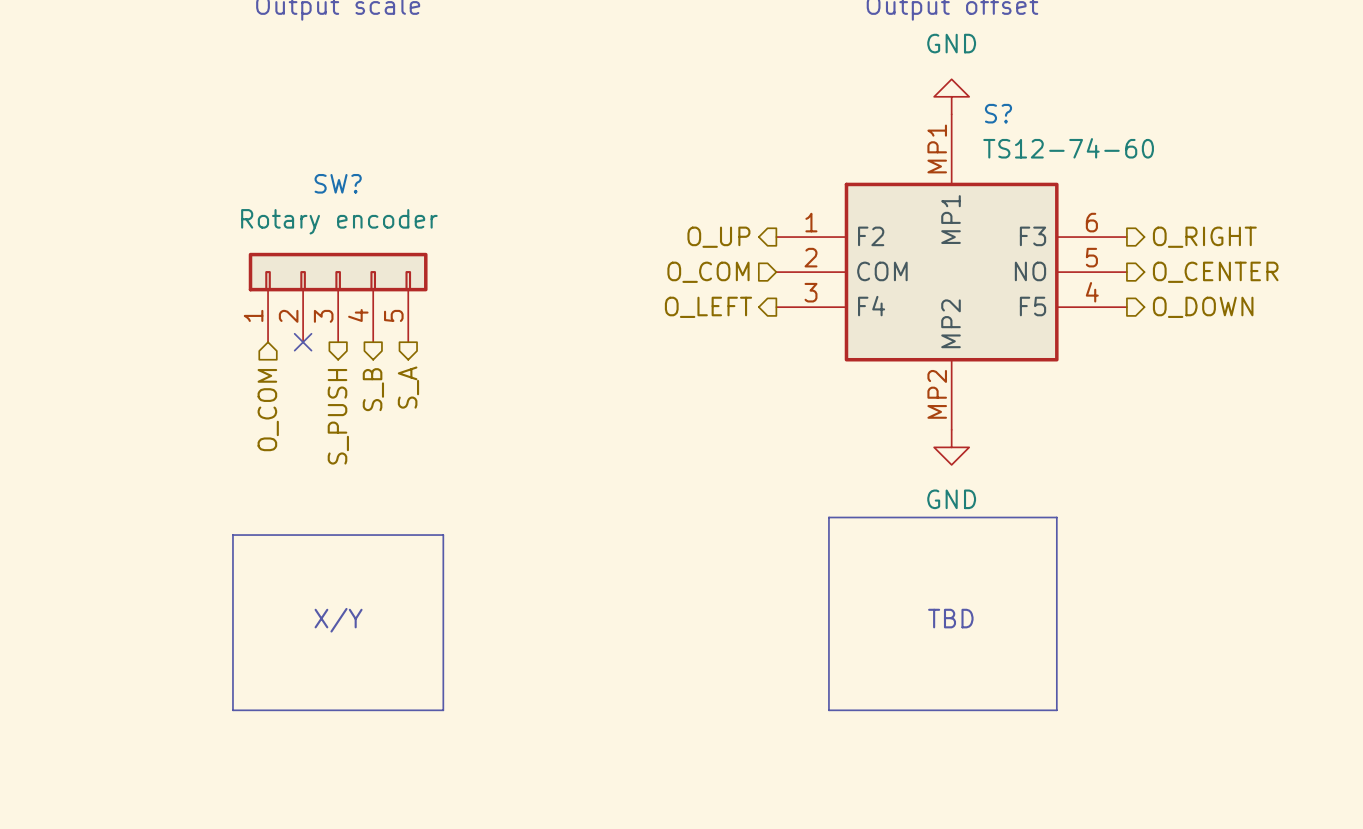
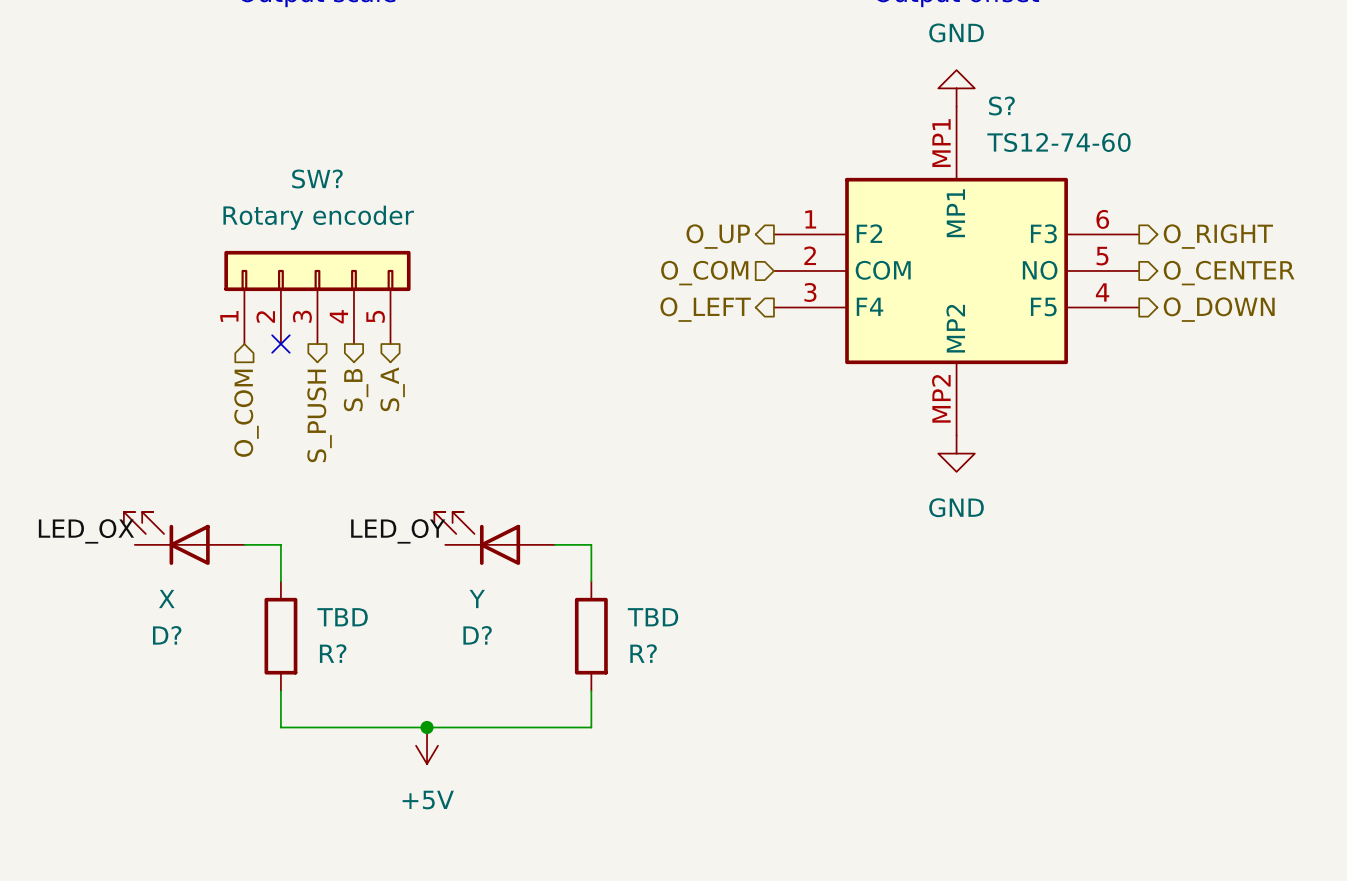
line: (828, 517) (1056, 517) (1056, 710) (828, 710) (828, 517) -> none
label: none -> LED_OX (86, 531)
label: none -> LED_OY (398, 531)
D?: none -> X (184, 538)
D?: none -> Y (494, 538)
line: (232, 535) (443, 535) (443, 710) (232, 710) (232, 535) -> none
wire: none -> (244, 544) (280, 544) (280, 581)
wire: none -> (554, 544) (591, 544) (591, 581)
text: TBD (950, 618) -> none
text: X/Y (338, 620) -> none
R?: none -> TBD (280, 636)
R?: none -> TBD (591, 636)
wire: none -> (280, 690) (280, 727) (591, 727) (591, 690)
junction: none -> (427, 727)
power symbol: none -> +5V (427, 745)

